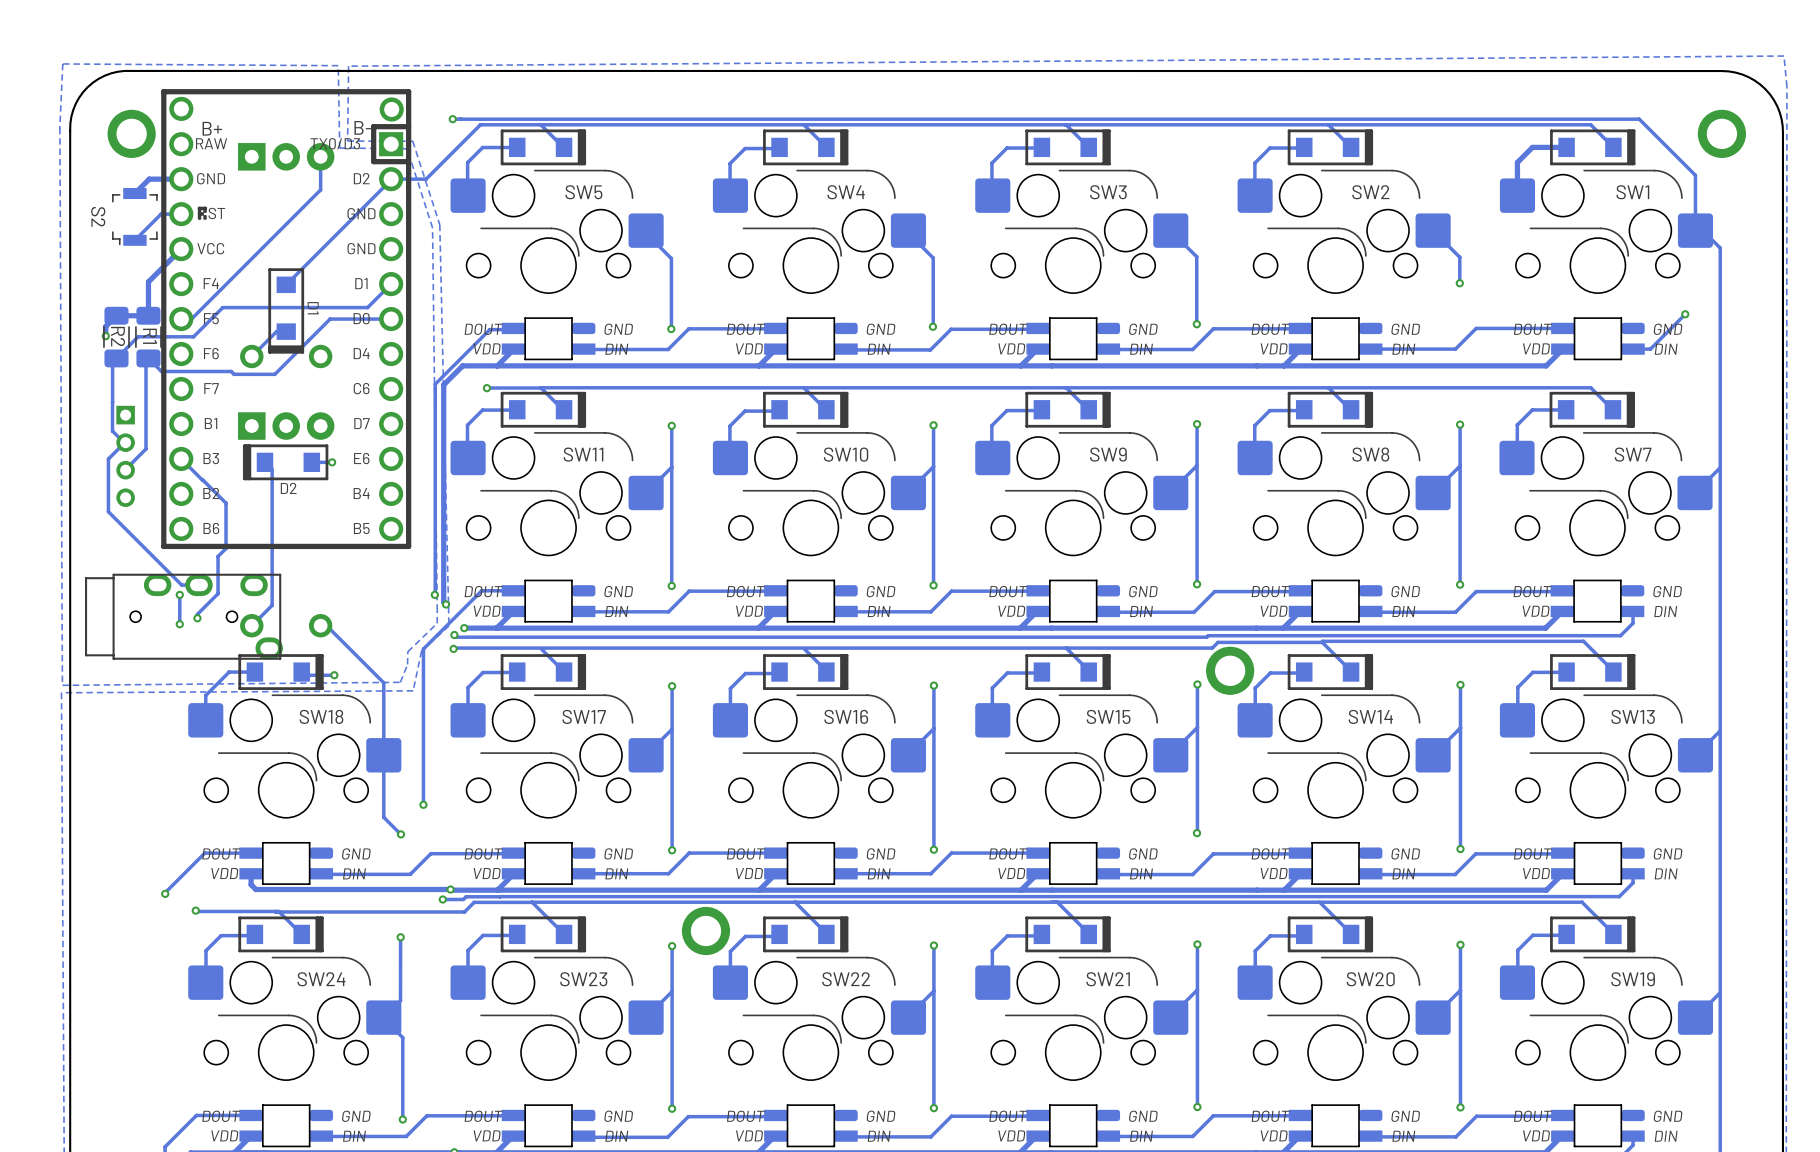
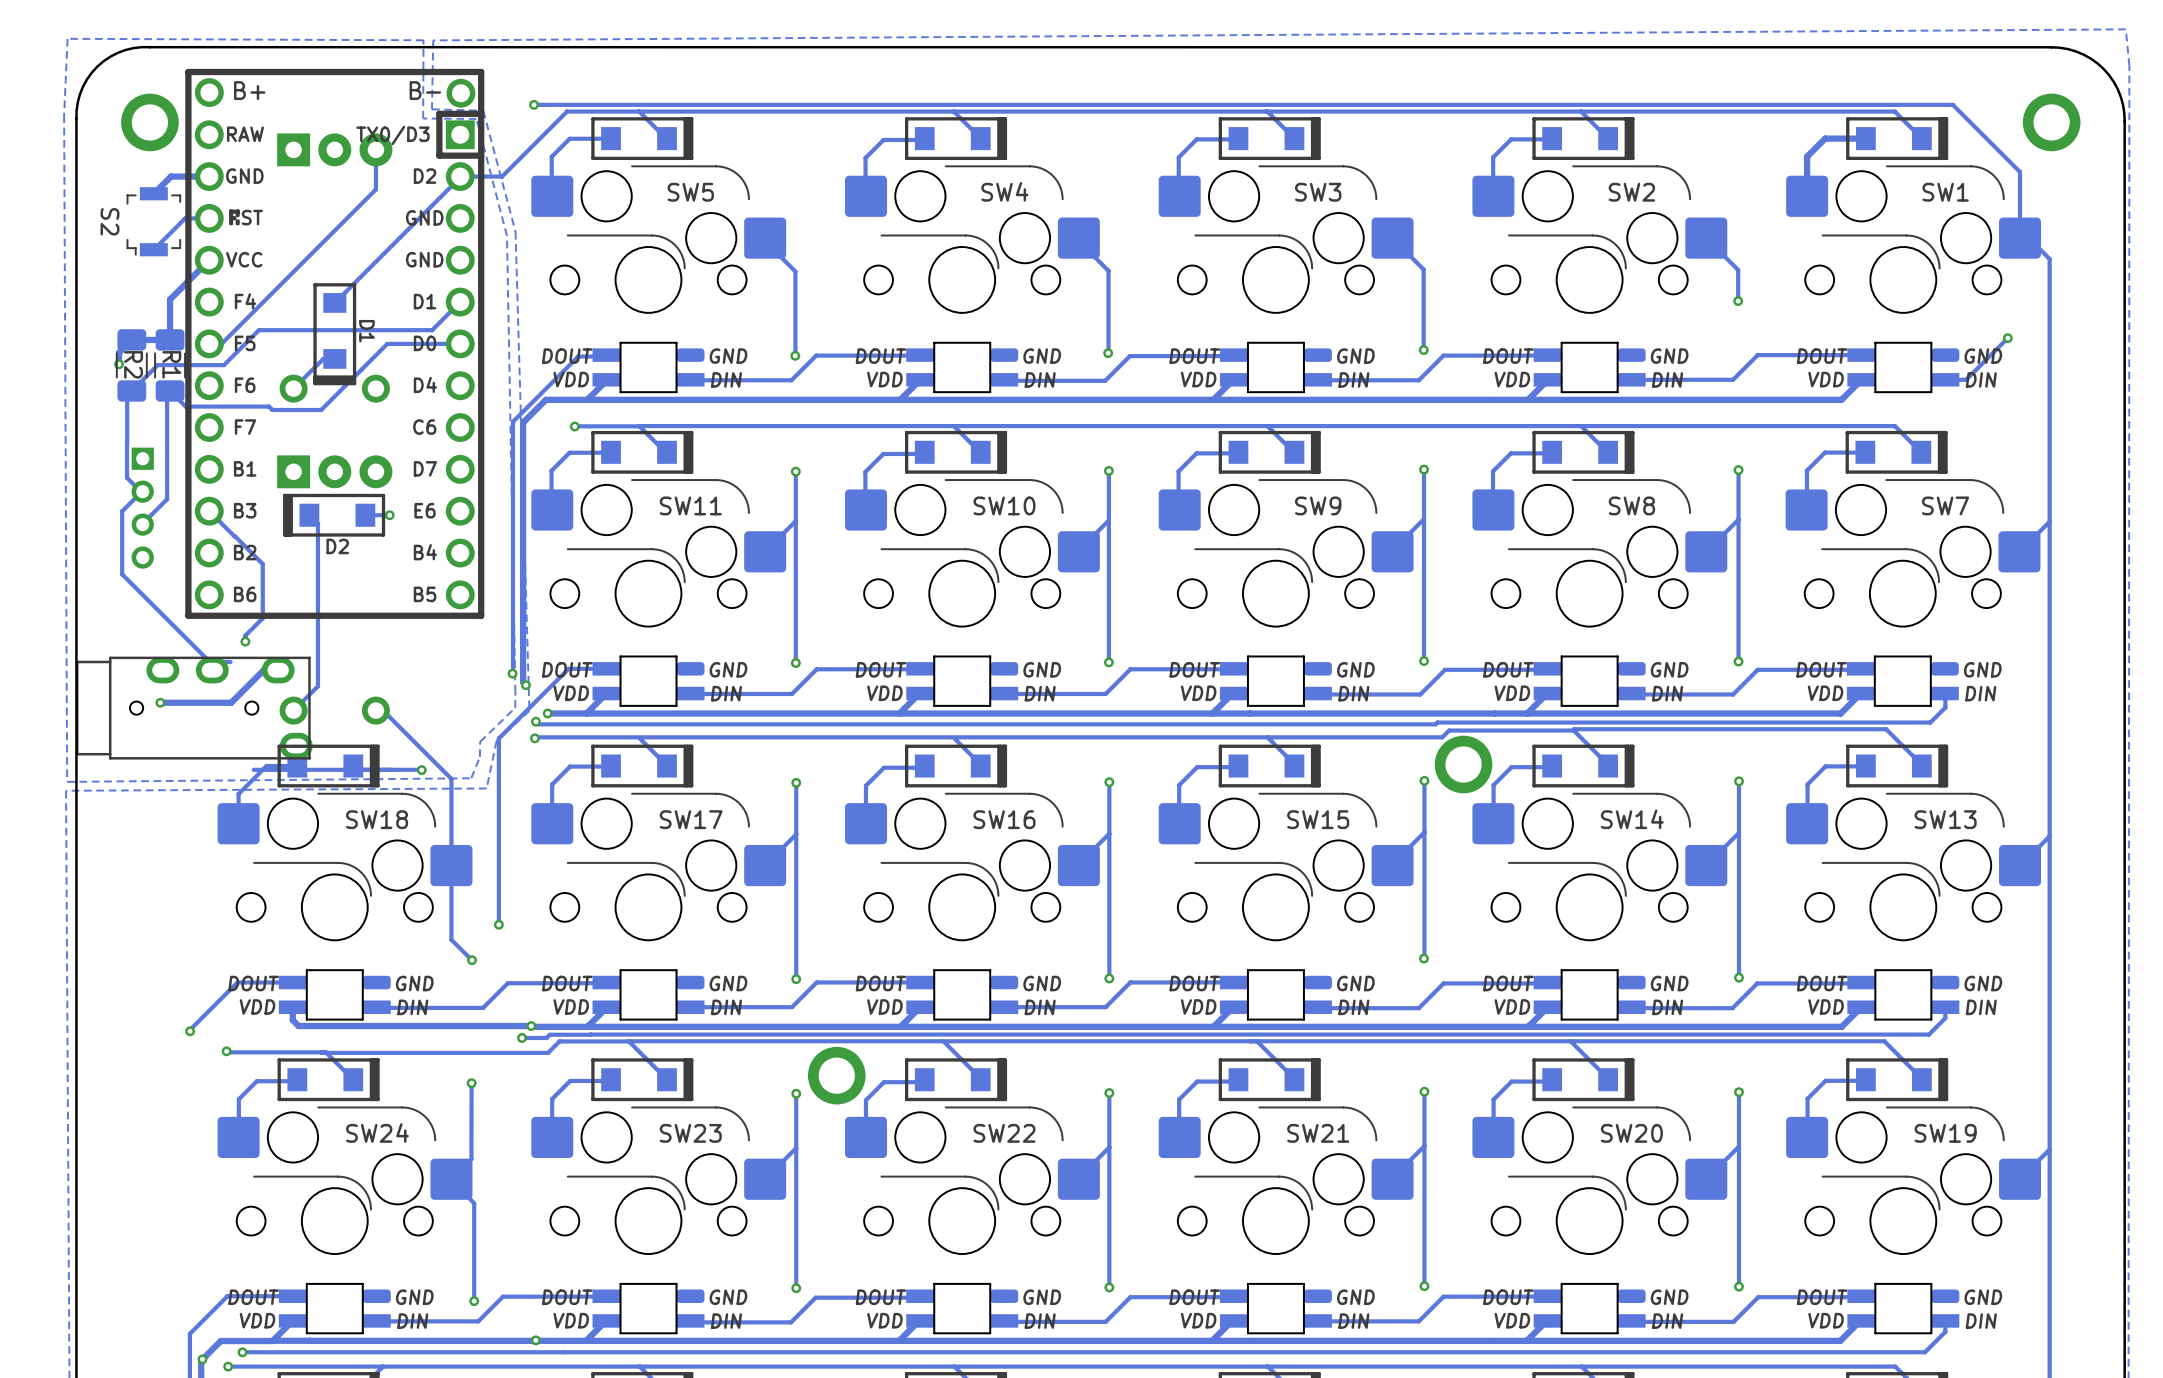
zone outline: (1783, 56) (348, 66) (347, 141) (412, 141) (439, 224) (448, 625) -> (2125, 29) (433, 40) (431, 109) (483, 110) (515, 231) (529, 710)
zone outline: (62, 63) (338, 65) (339, 148) (407, 148) (432, 227) (437, 610) -> (67, 38) (423, 40) (423, 118) (476, 118) (506, 235) (515, 692)
text position: B- (363, 127) -> B- (425, 90)
text position: B+ (212, 128) -> B+ (249, 90)
track: (218, 556) (218, 593) (197, 614) (197, 618) -> (253, 627) (245, 635) (245, 641)
via: none -> (245, 641)
track: none -> (278, 670) (263, 670) (231, 702) (160, 702)
track: (179, 594) (179, 624) -> none
via: (179, 594) -> none
part position: (183, 616) -> (194, 708)
via: (197, 618) -> none
via: none -> (160, 702)
via: (179, 624) -> none
track: none -> (253, 769) (421, 770)
via position: (334, 675) -> (421, 770)

